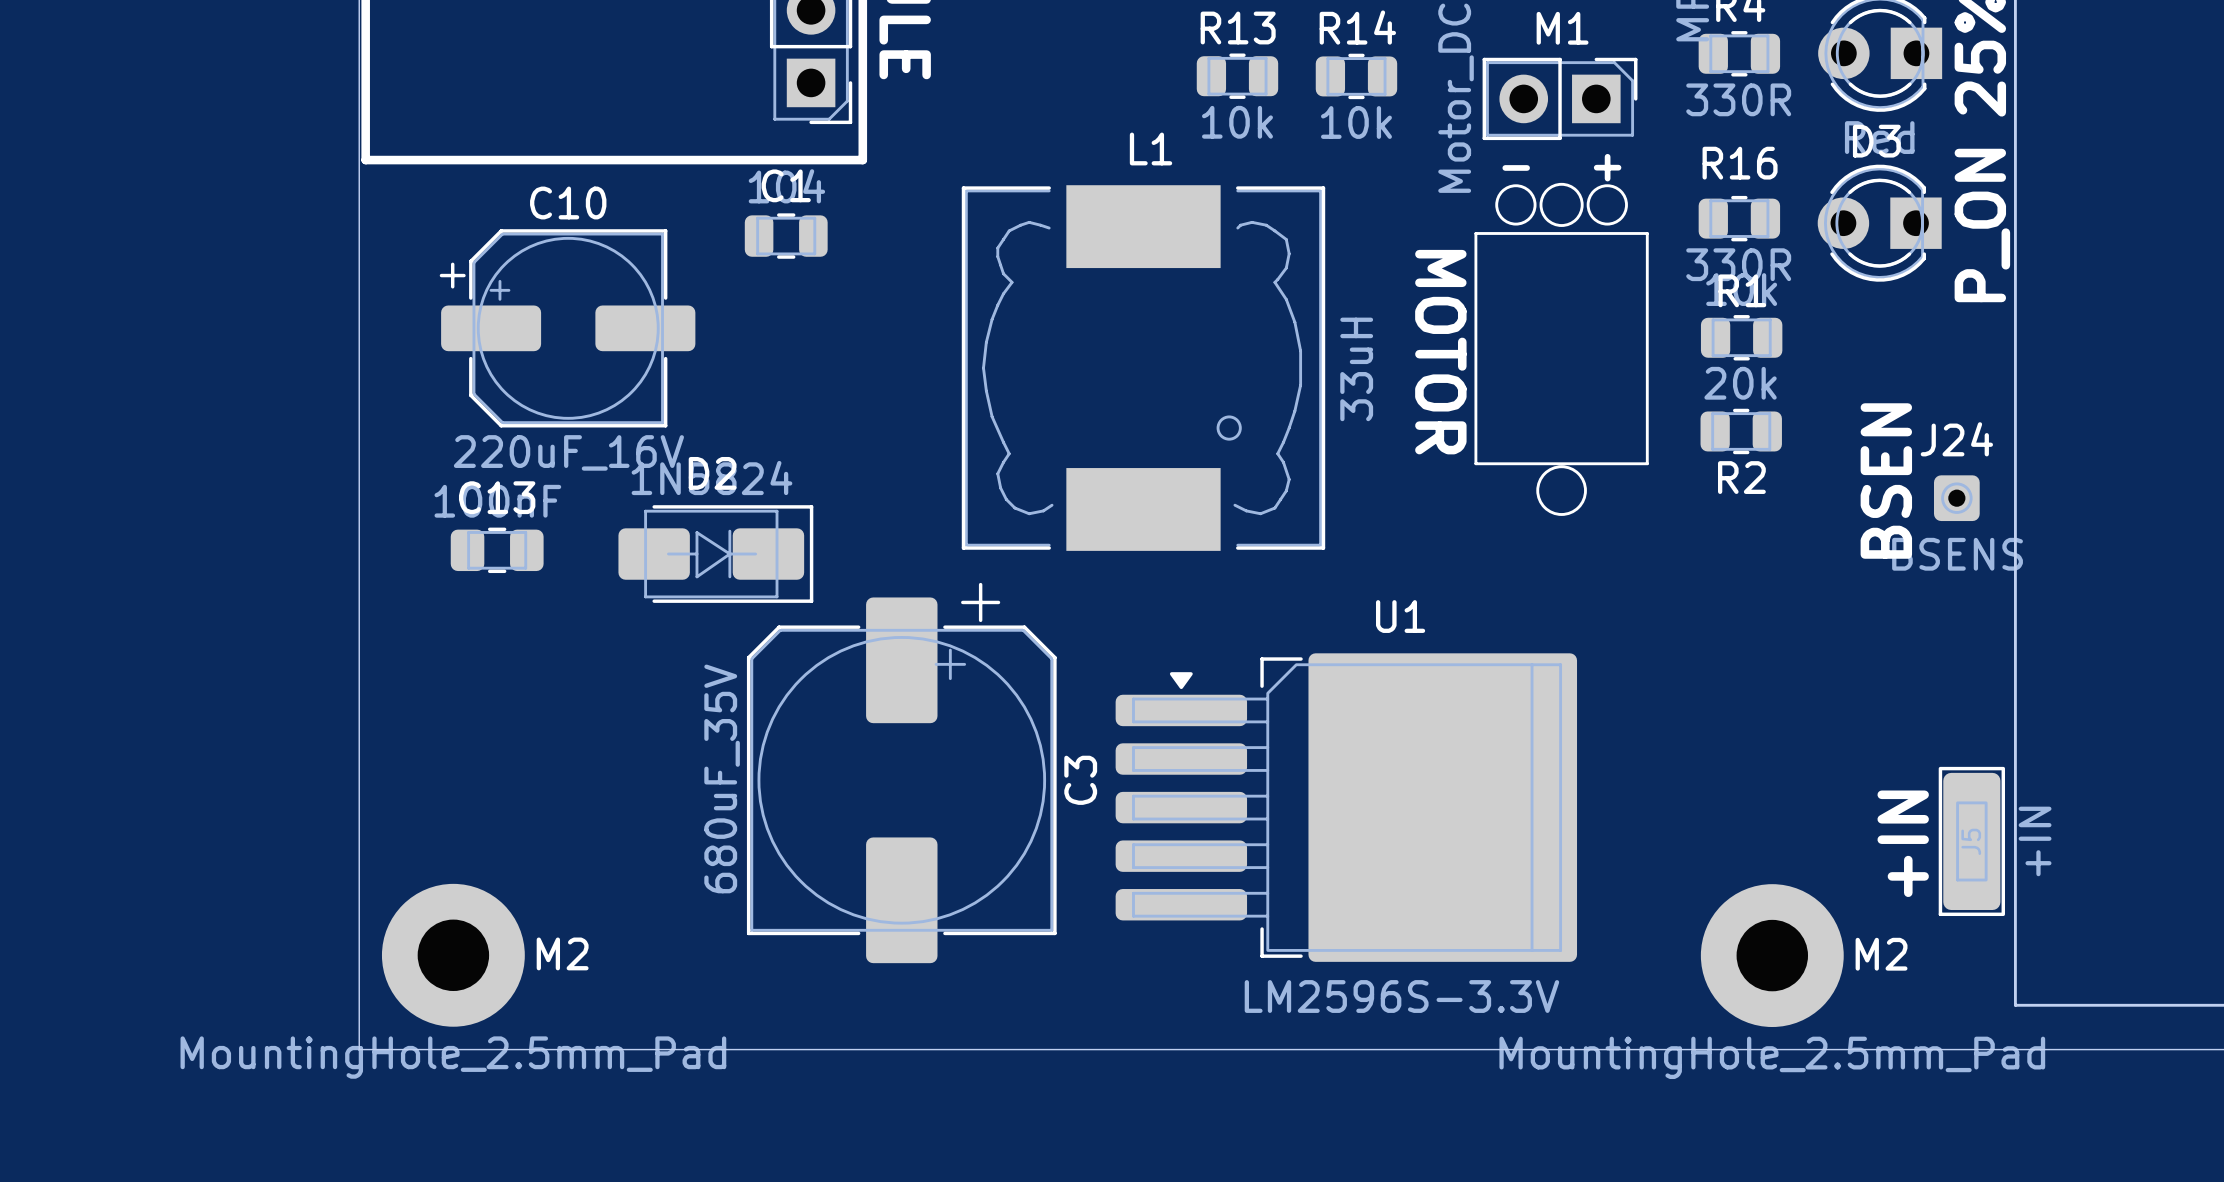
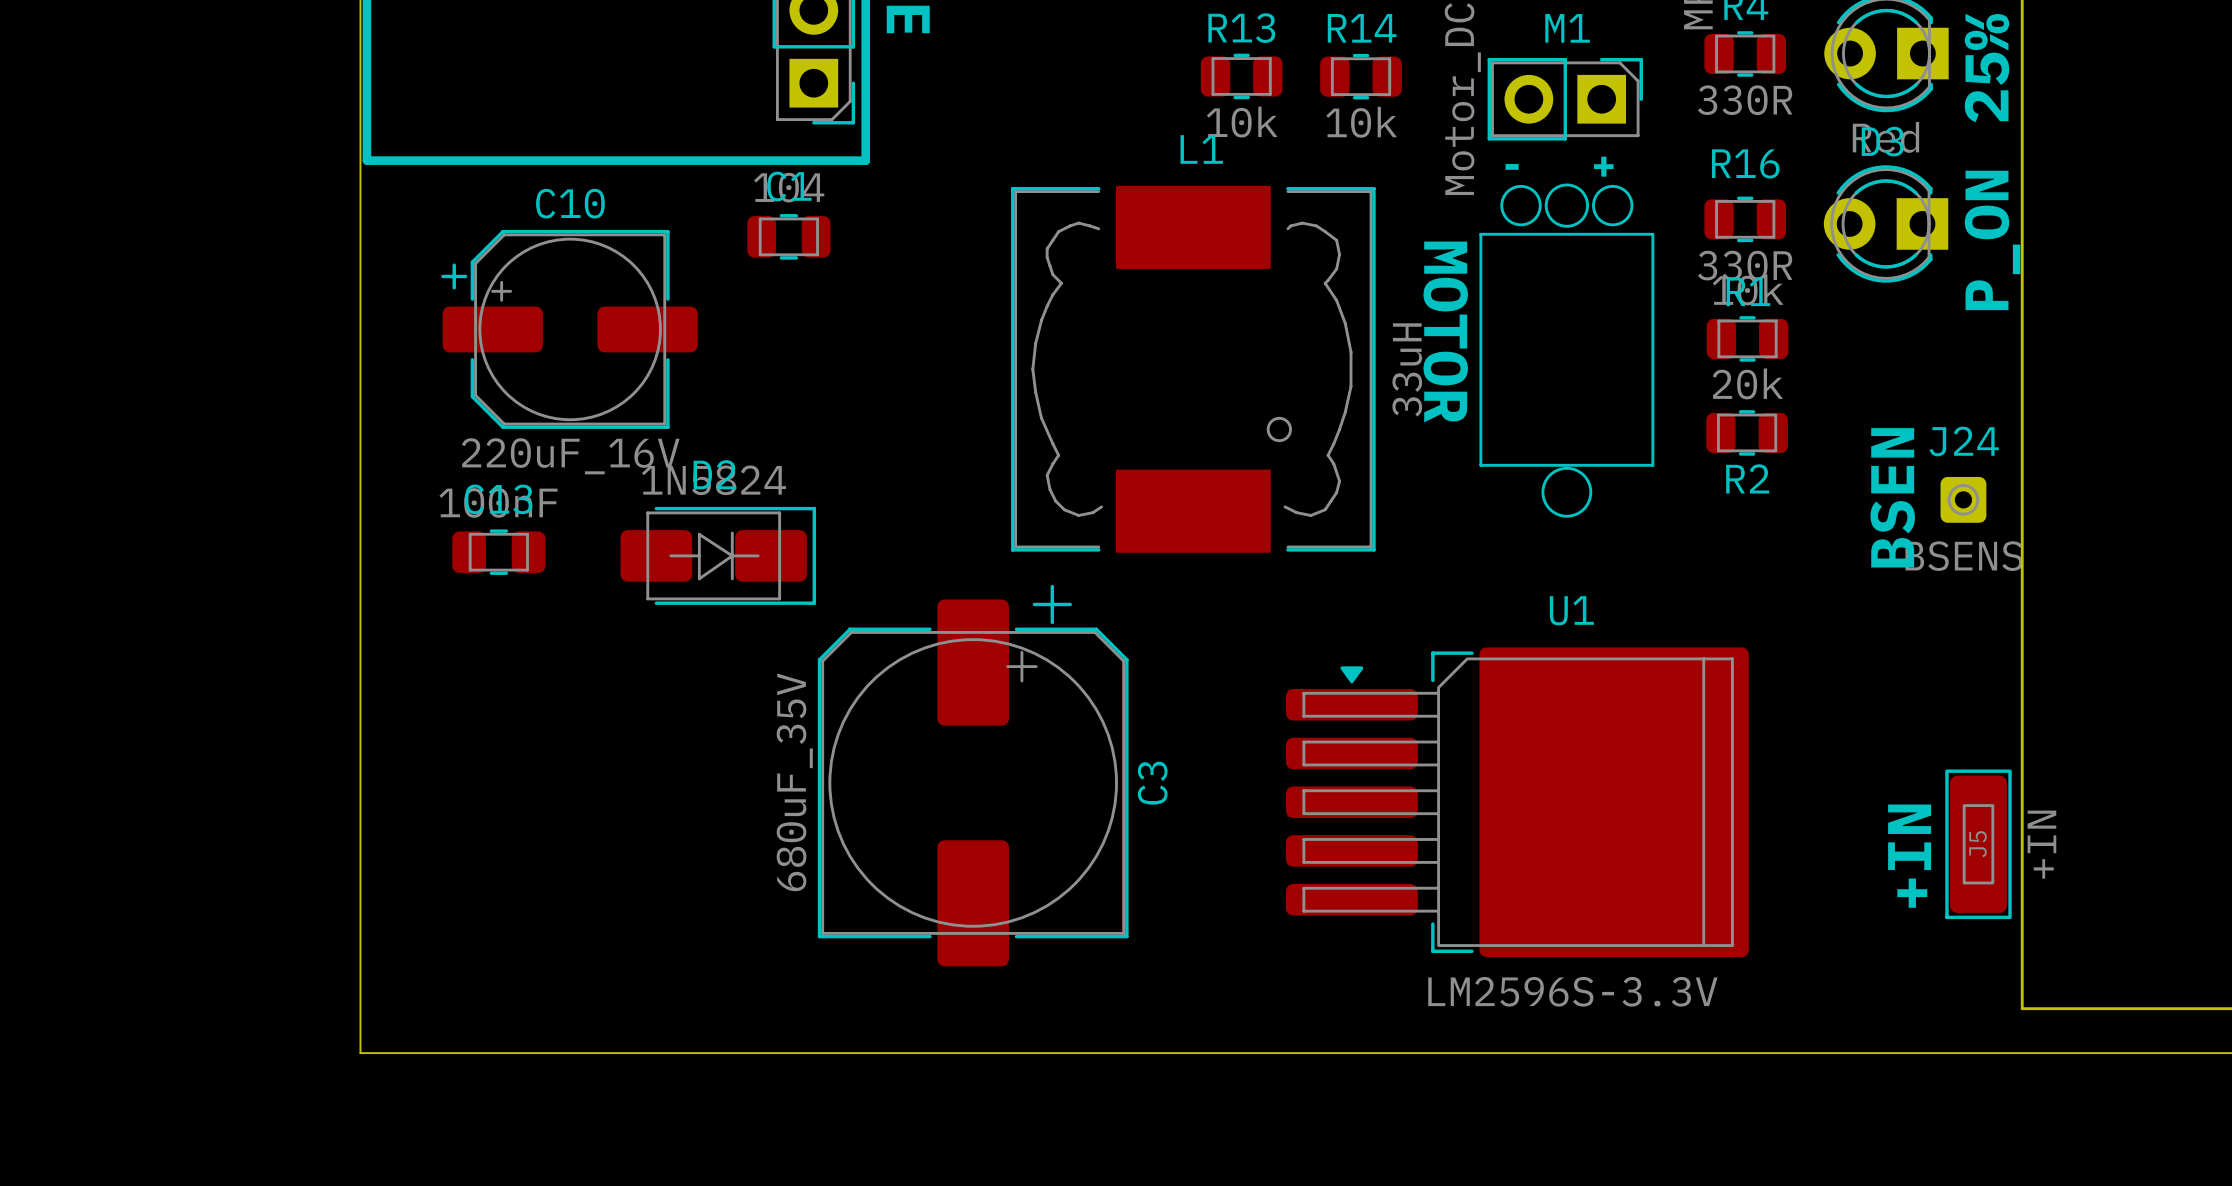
L1 position: (1143, 368) -> (1193, 369)
C3 position: (901, 773) -> (973, 775)
U1 position: (1346, 807) -> (1517, 802)
M2: MountingHole_2.5mm_Pad (453, 955) -> none
M2: MountingHole_2.5mm_Pad (1772, 955) -> none

